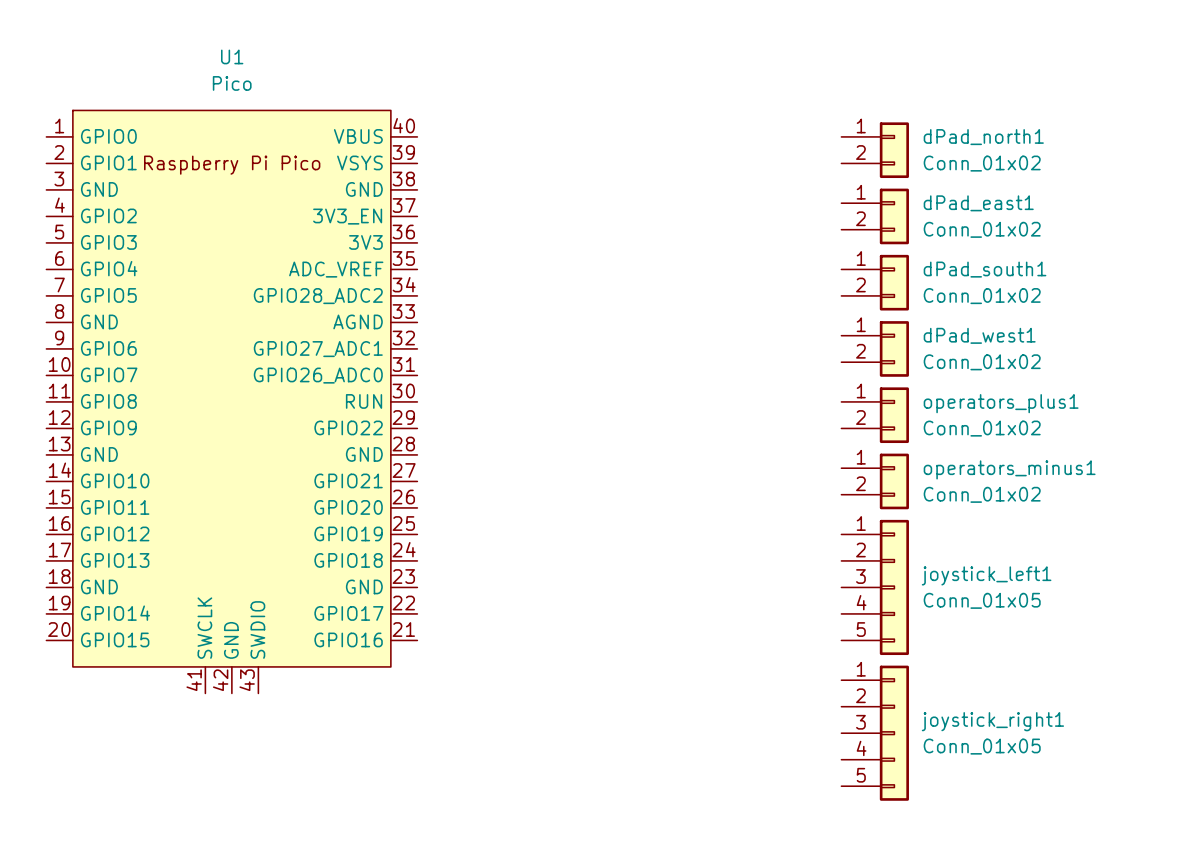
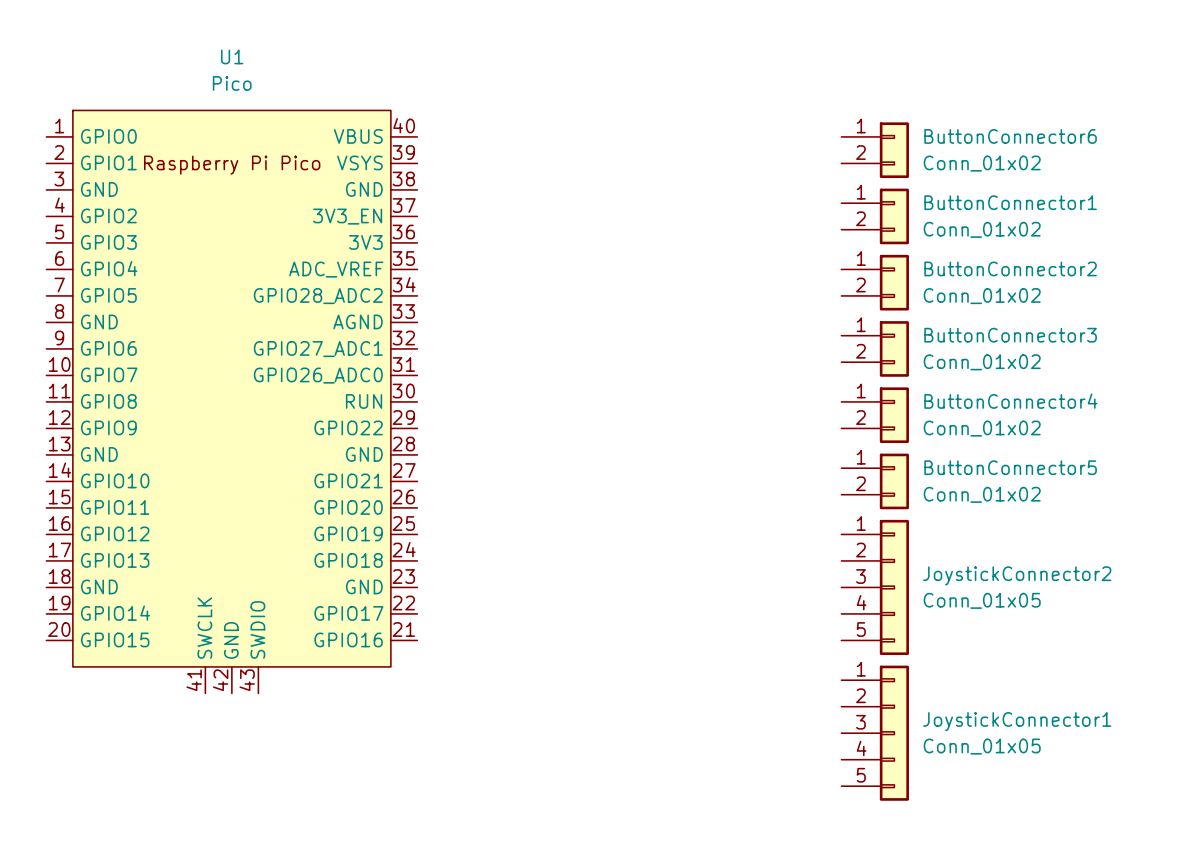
dPad_north1 name: dPad_north1 (983, 137) -> ButtonConnector6 (1010, 136)
dPad_east1 name: dPad_east1 (978, 203) -> ButtonConnector1 (1010, 202)
dPad_south1 name: dPad_south1 (985, 269) -> ButtonConnector2 (1010, 268)
dPad_west1 name: dPad_west1 (979, 335) -> ButtonConnector3 (1010, 335)
operators_plus1 name: operators_plus1 (1001, 403) -> ButtonConnector4 (1010, 401)
operators_minus1 name: operators_minus1 (1009, 469) -> ButtonConnector5 (1010, 467)
joystick_left1 name: joystick_left1 (986, 575) -> JoystickConnector2 (1017, 575)
joystick_right1 name: joystick_right1 (992, 721) -> JoystickConnector1 (1017, 721)

